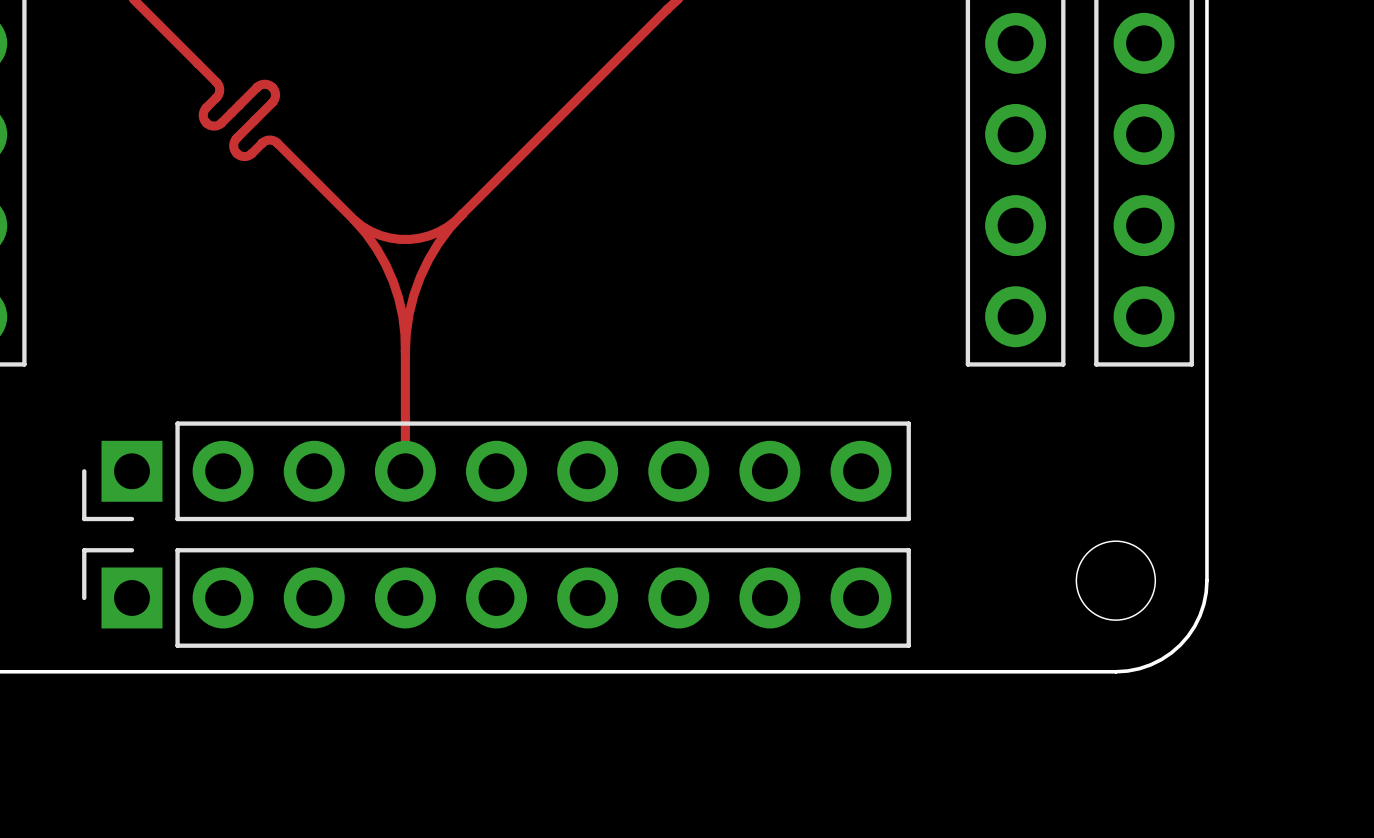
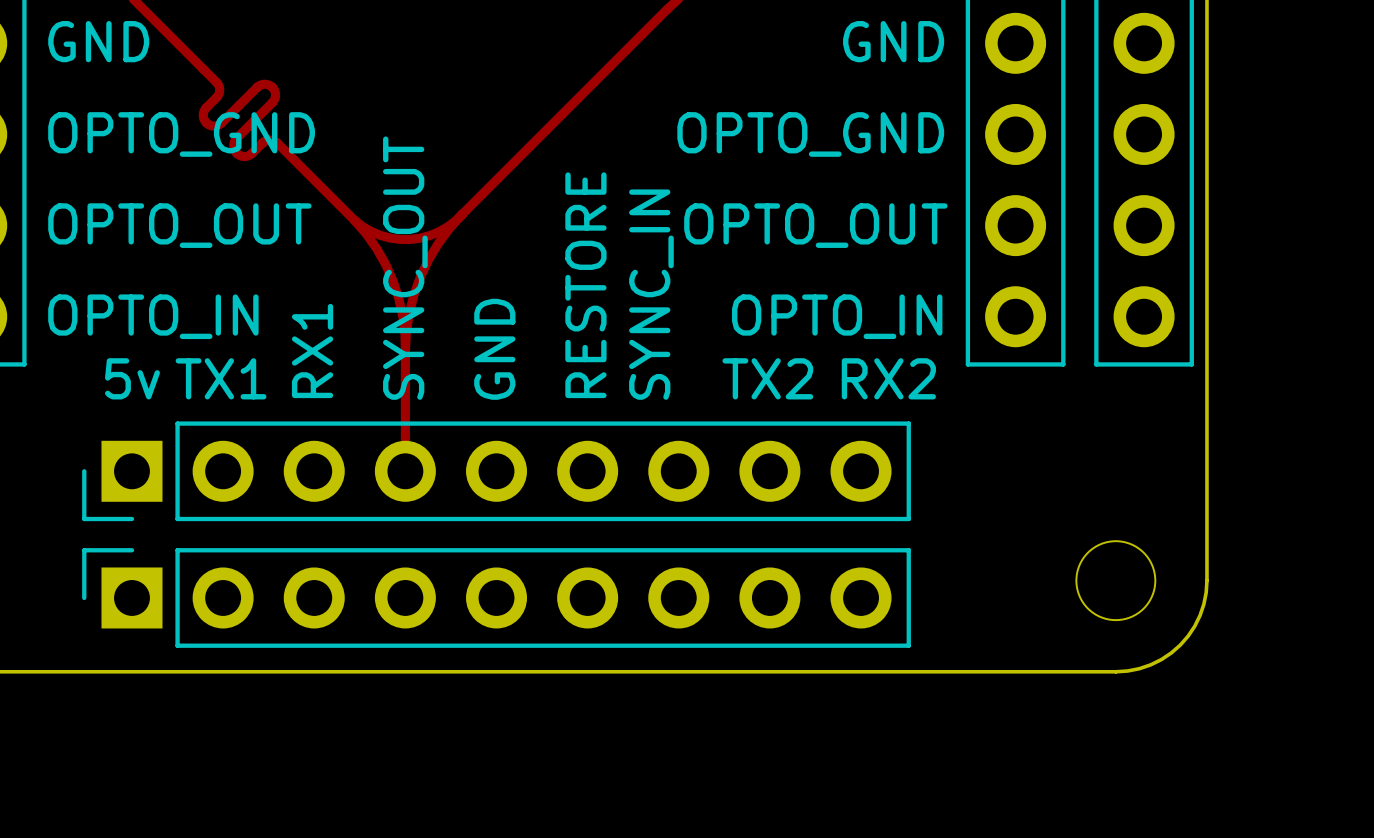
text: none -> GND (98, 41)
text: none -> GND (893, 41)
text: none -> OPTO_GND (181, 134)
text: none -> OPTO_GND (810, 134)
text: none -> OPTO_OUT (179, 225)
text: none -> OPTO_OUT (815, 225)
text: none -> SYNC_OUT (405, 268)
text: none -> RESTORE (585, 285)
text: none -> SYNC_IN (651, 294)
text: none -> OPTO_IN (153, 316)
text: none -> OPTO_IN (837, 316)
text: none -> GND (494, 349)
text: none -> RX1 (312, 351)
text: none -> TX1 (221, 378)
text: none -> TX2 (767, 378)
text: none -> RX2 (888, 378)
text: none -> 5v (132, 378)

